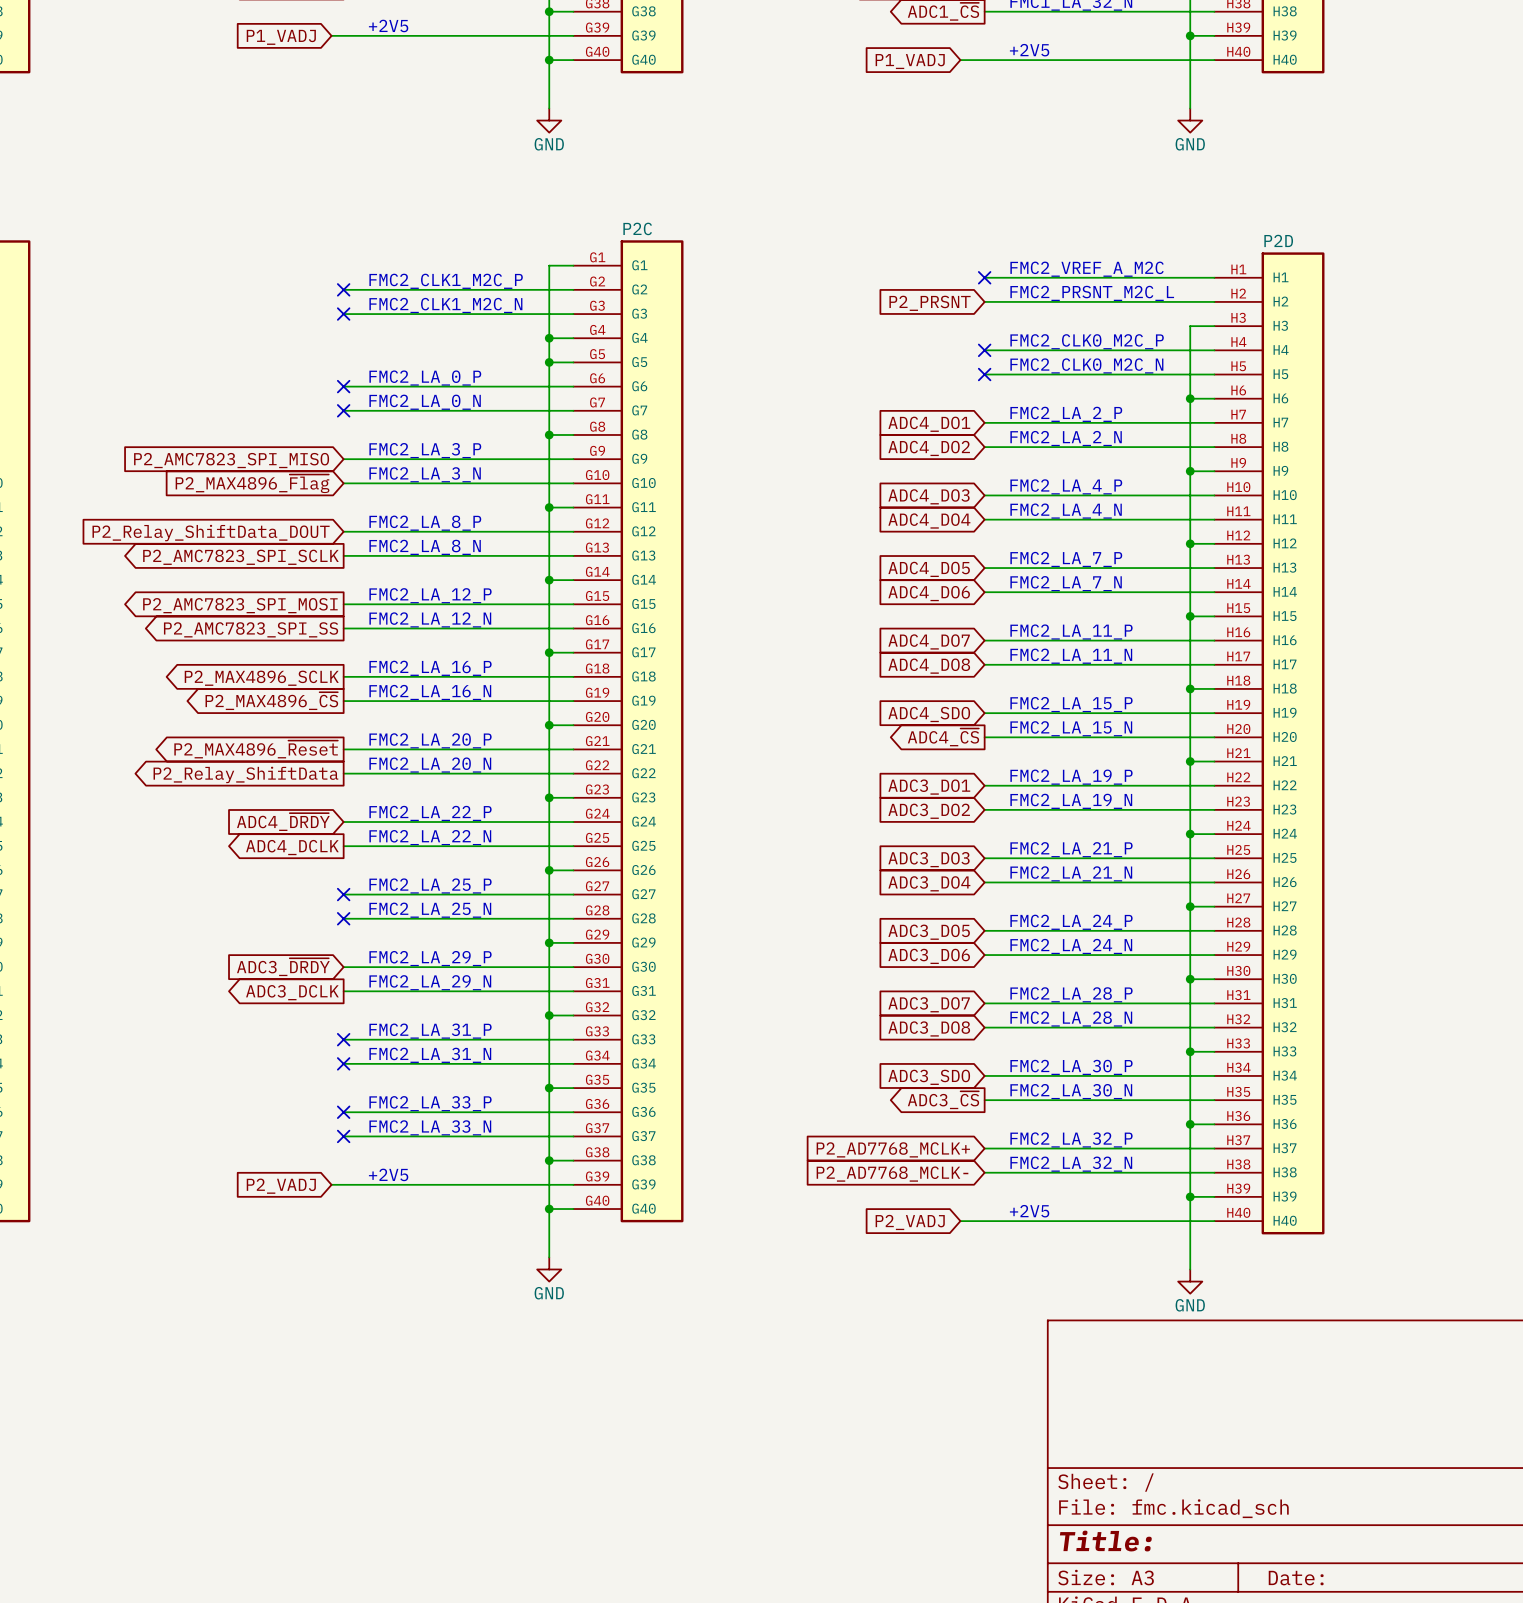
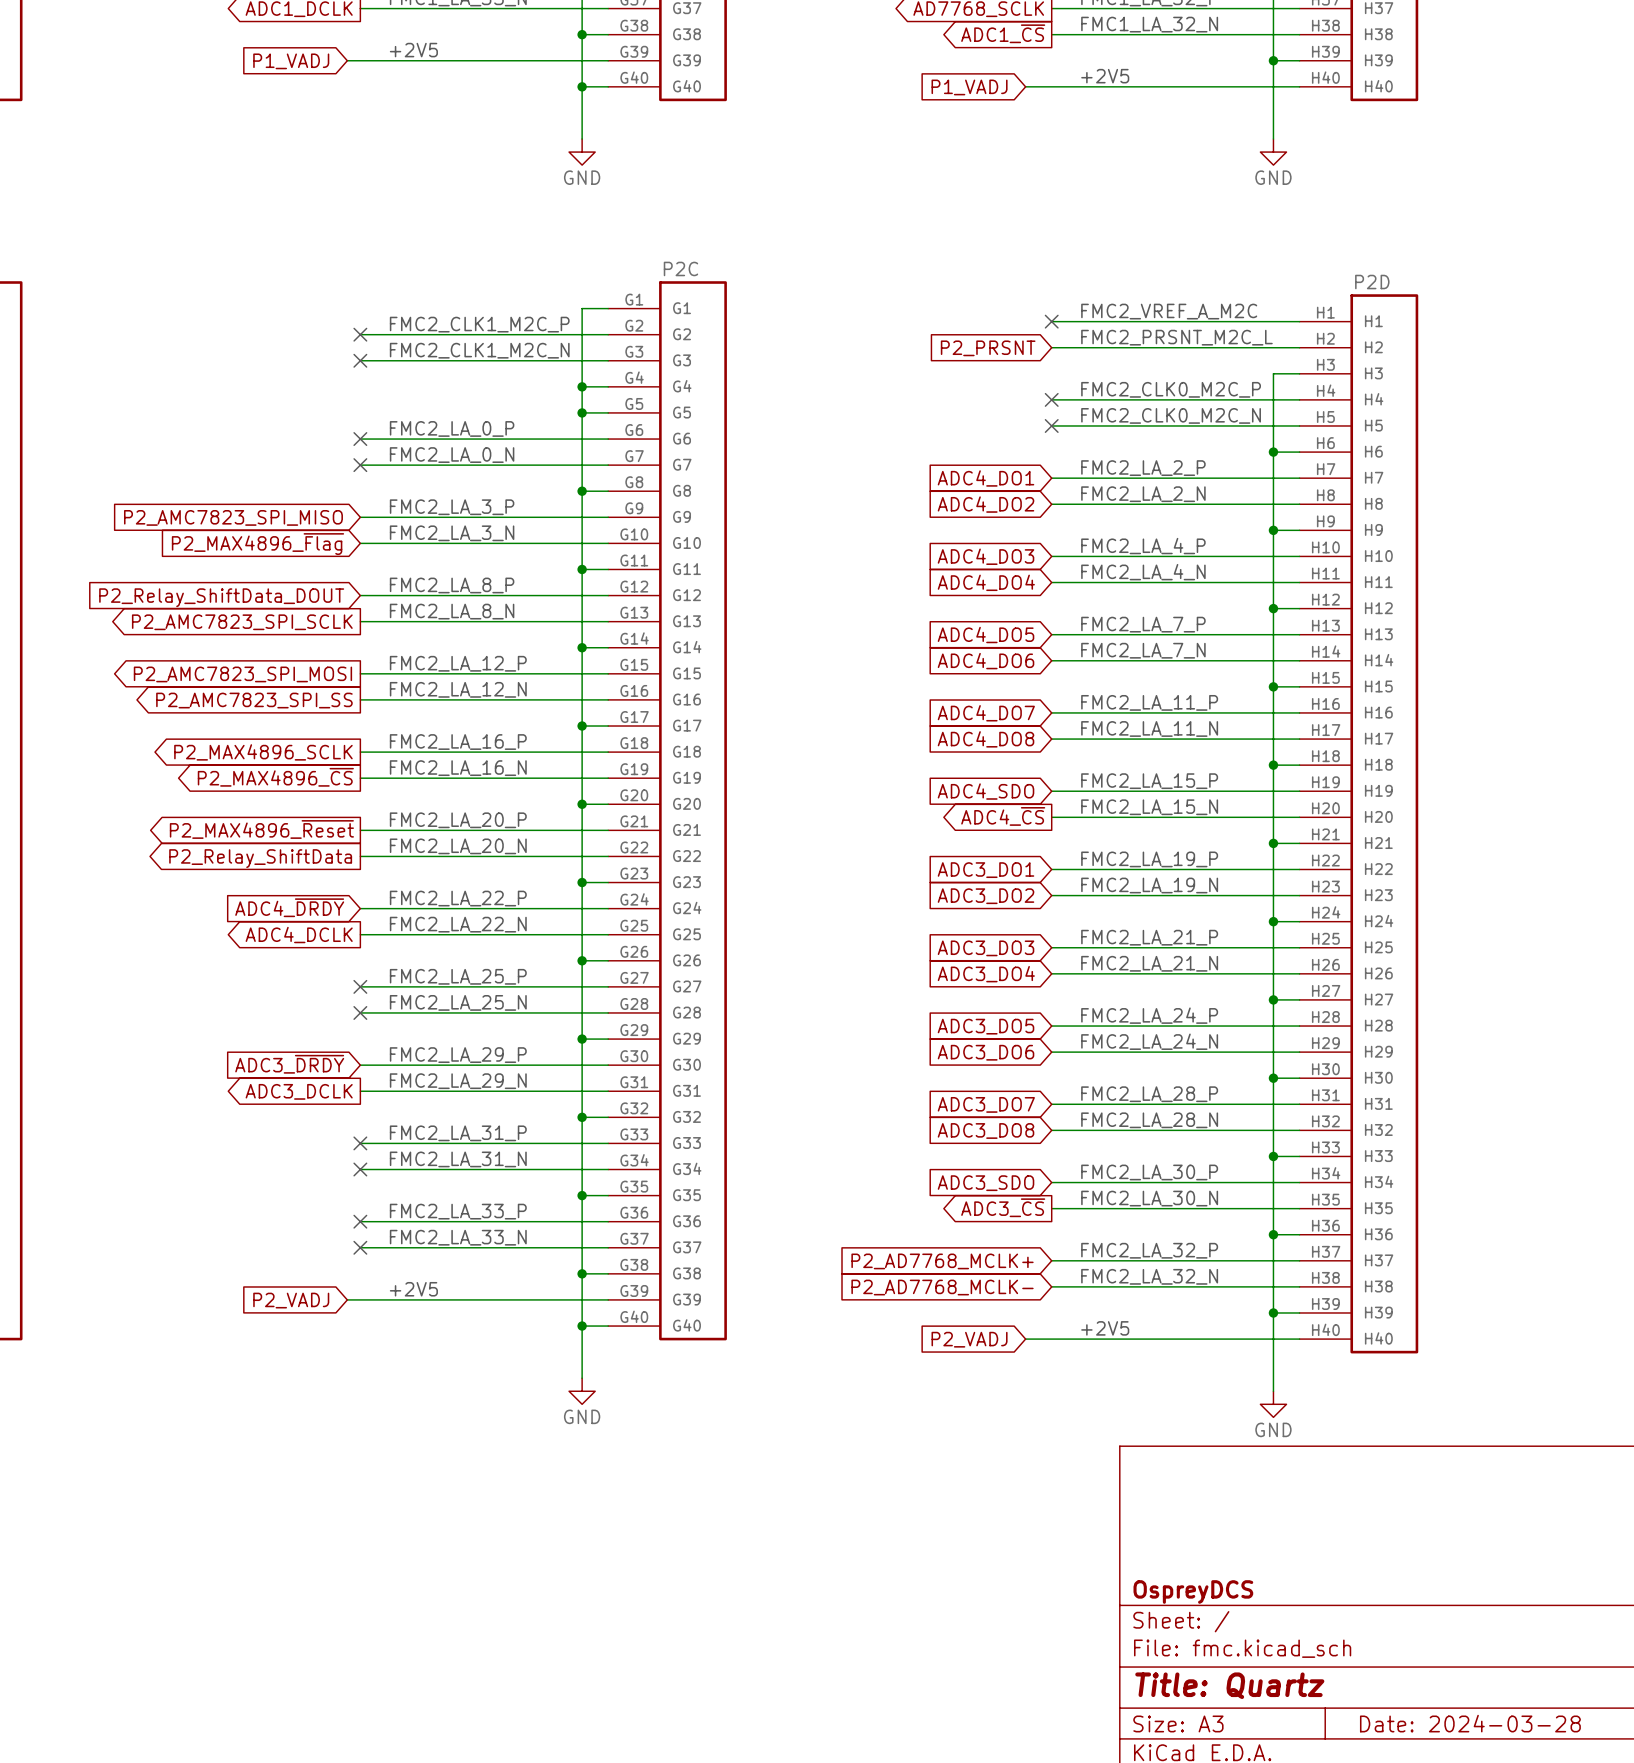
title block: none -> OspreyDCS (1193, 1591)
title block: Title: (1105, 1541) -> Title: Quartz (1229, 1685)
title block: Date: (1296, 1578) -> Date: 2024-03-28 (1470, 1723)

